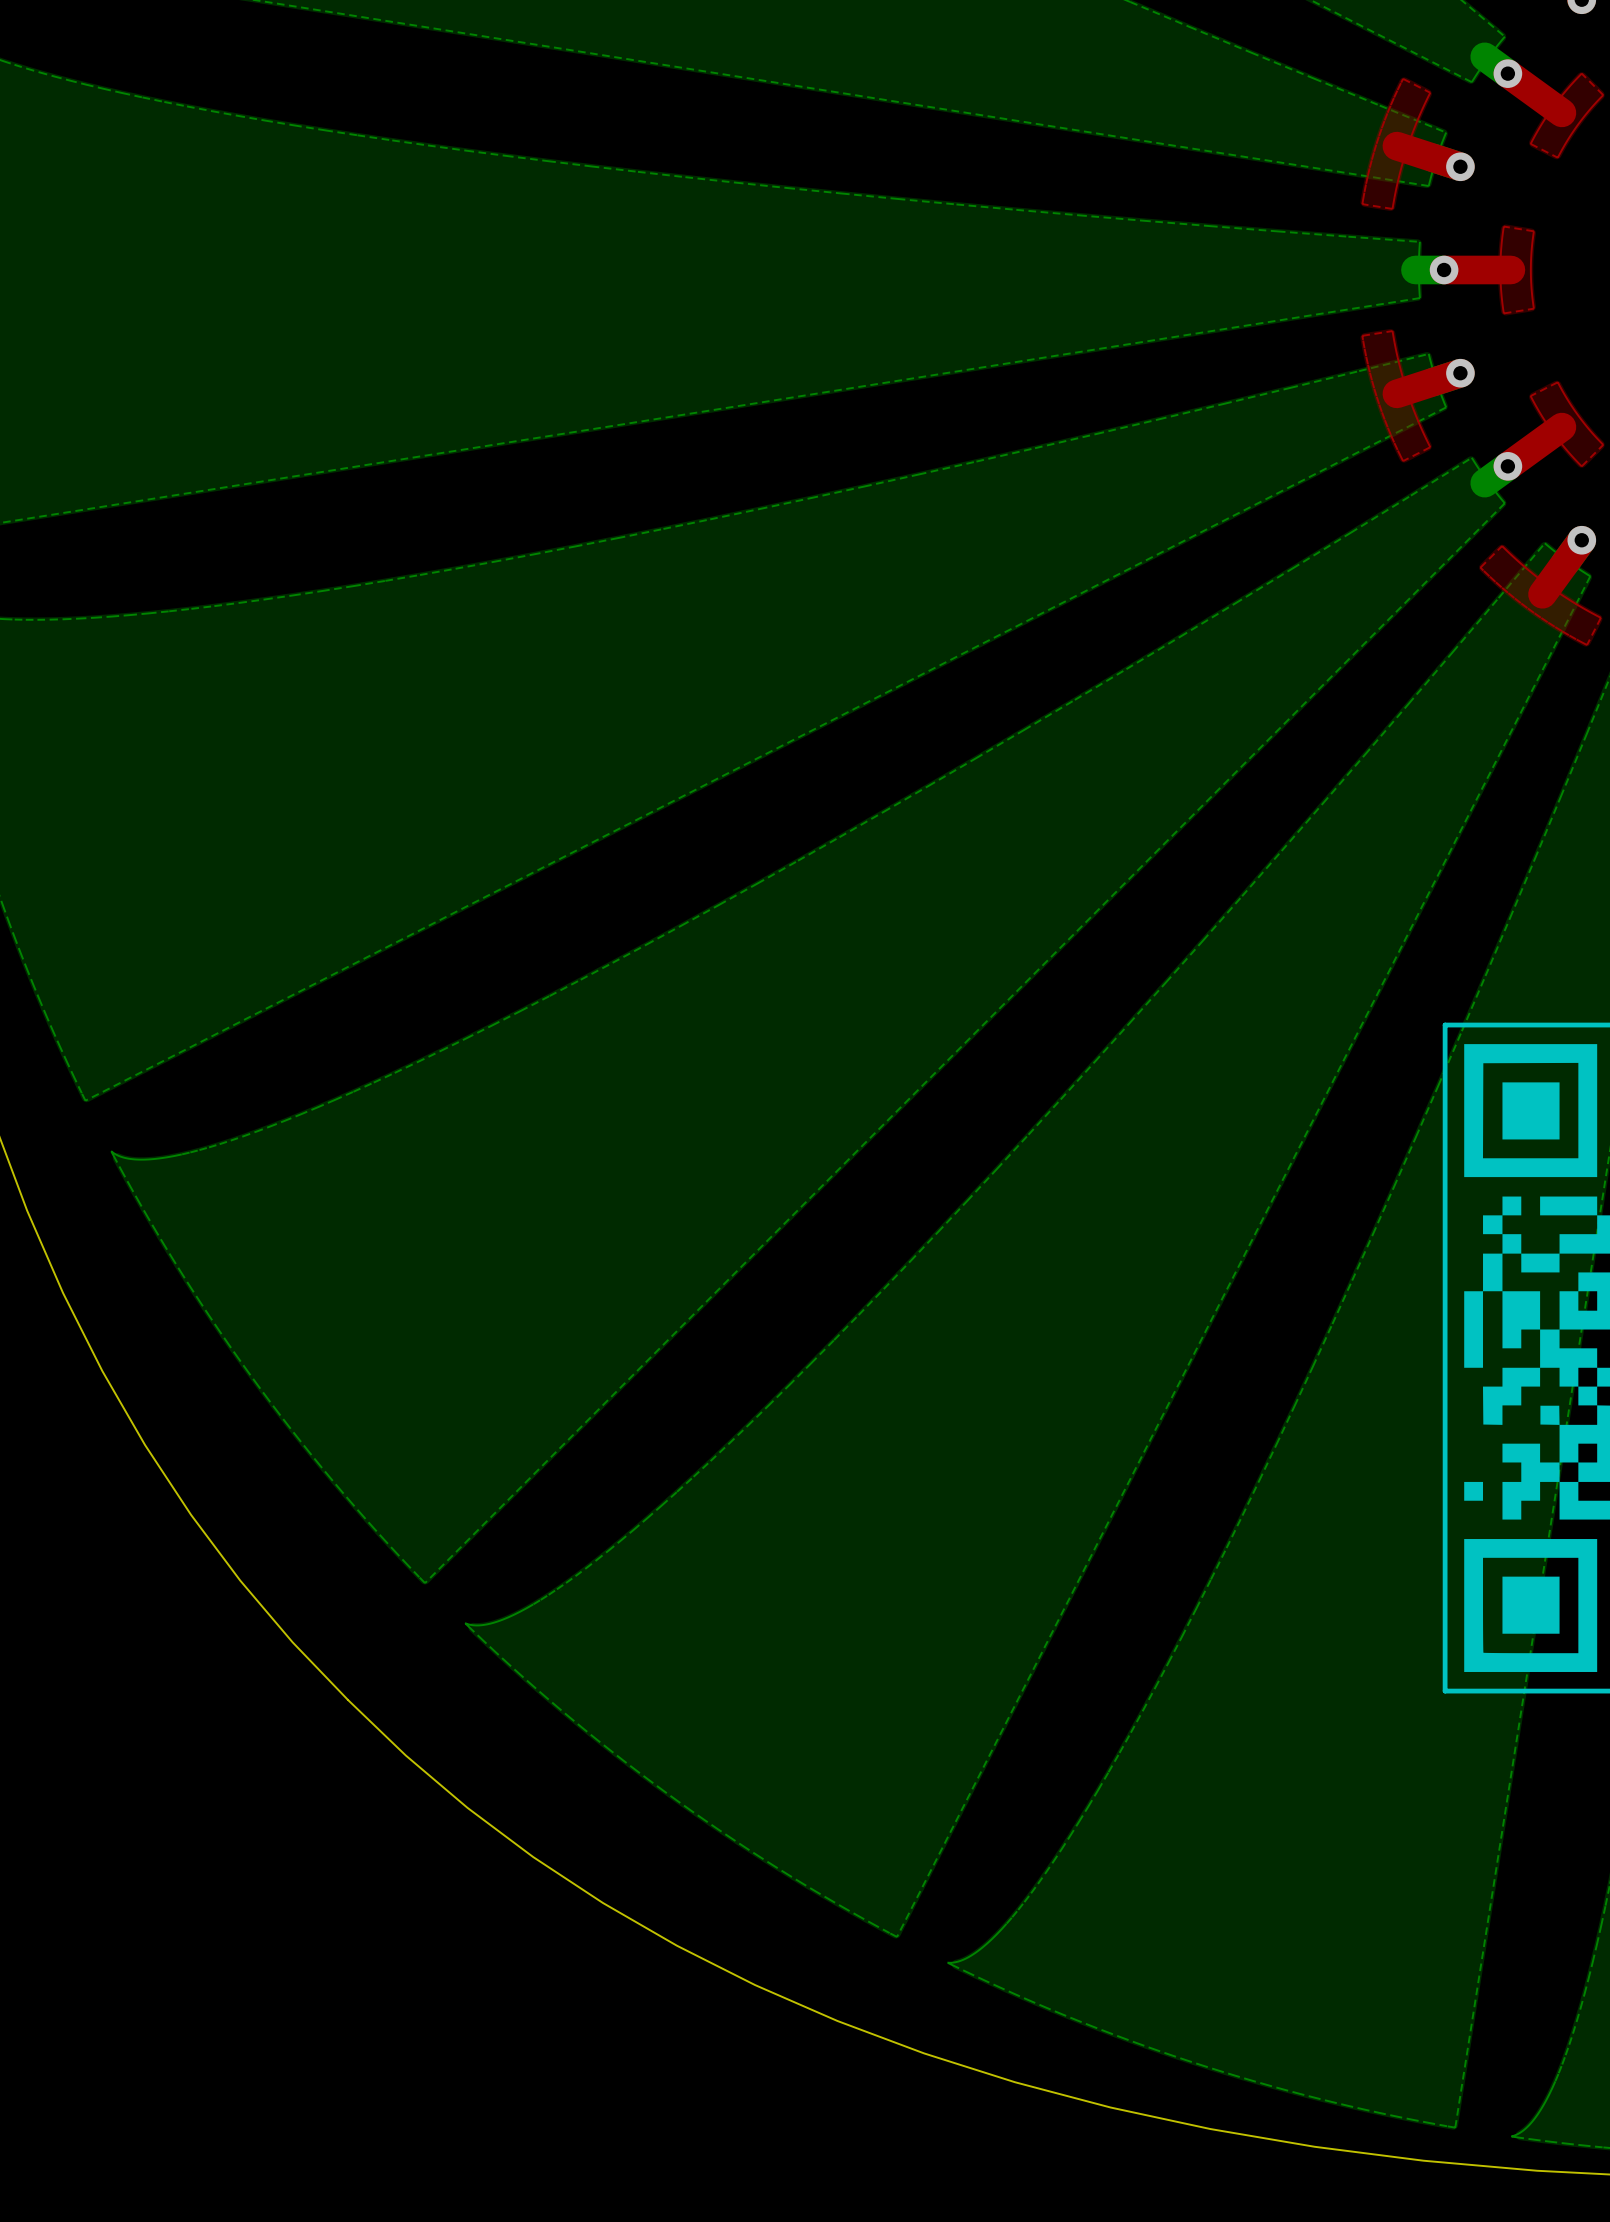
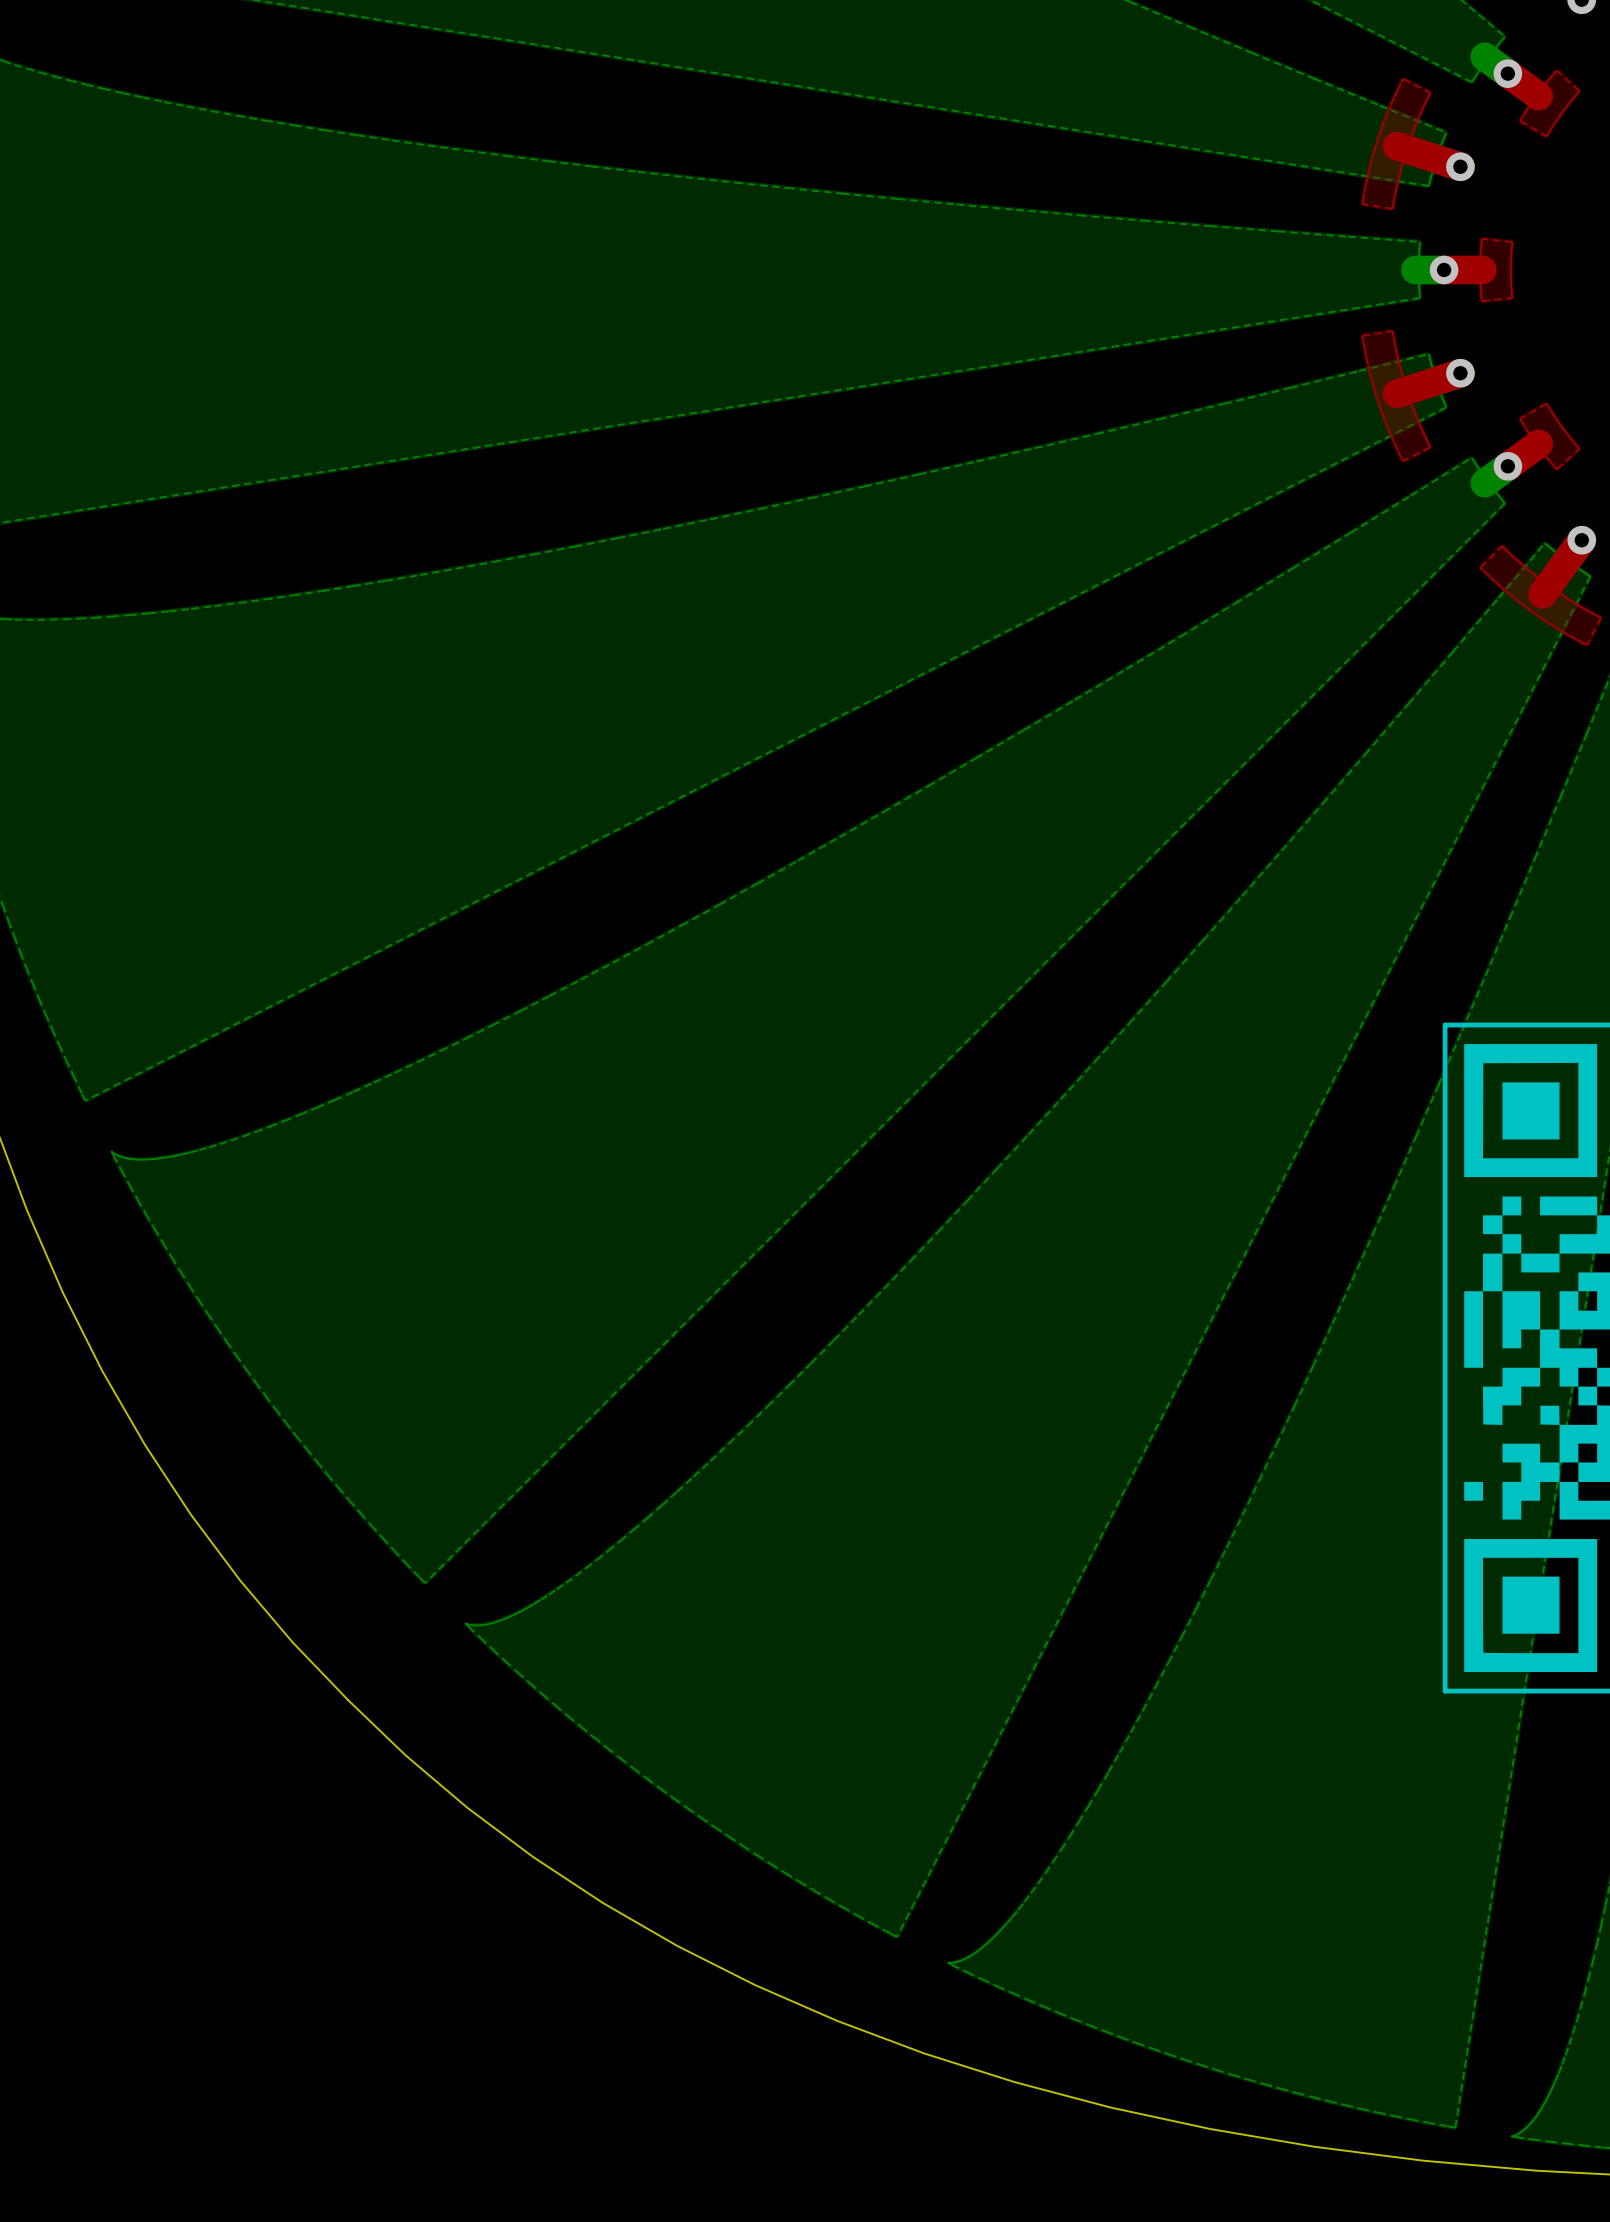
top zone outline: none -> (1556, 70) (1579, 91) (1546, 136) (1520, 121) (1537, 94) (1545, 83) (1550, 78) (1554, 73) (1556, 70)
top zone outline: (1581, 73) (1553, 106) (1530, 143) (1557, 157) (1578, 124) (1603, 95) (1581, 73) -> none
top track: (1538, 96) (1561, 112) -> none
top zone outline: (1503, 226) (1500, 269) (1503, 313) (1533, 308) (1530, 269) (1533, 231) (1503, 226) -> none
top zone outline: none -> (1481, 238) (1512, 242) (1512, 297) (1481, 301) (1480, 269) (1480, 256) (1481, 249) (1481, 242) (1481, 238)
top track: (1482, 269) (1510, 269) -> none
top zone outline: (1557, 382) (1578, 415) (1603, 444) (1581, 466) (1553, 433) (1530, 396) (1557, 382) -> none
top zone outline: none -> (1546, 403) (1520, 418) (1537, 445) (1556, 469) (1579, 448) (1546, 403)
top track: (1561, 427) (1538, 443) -> none

